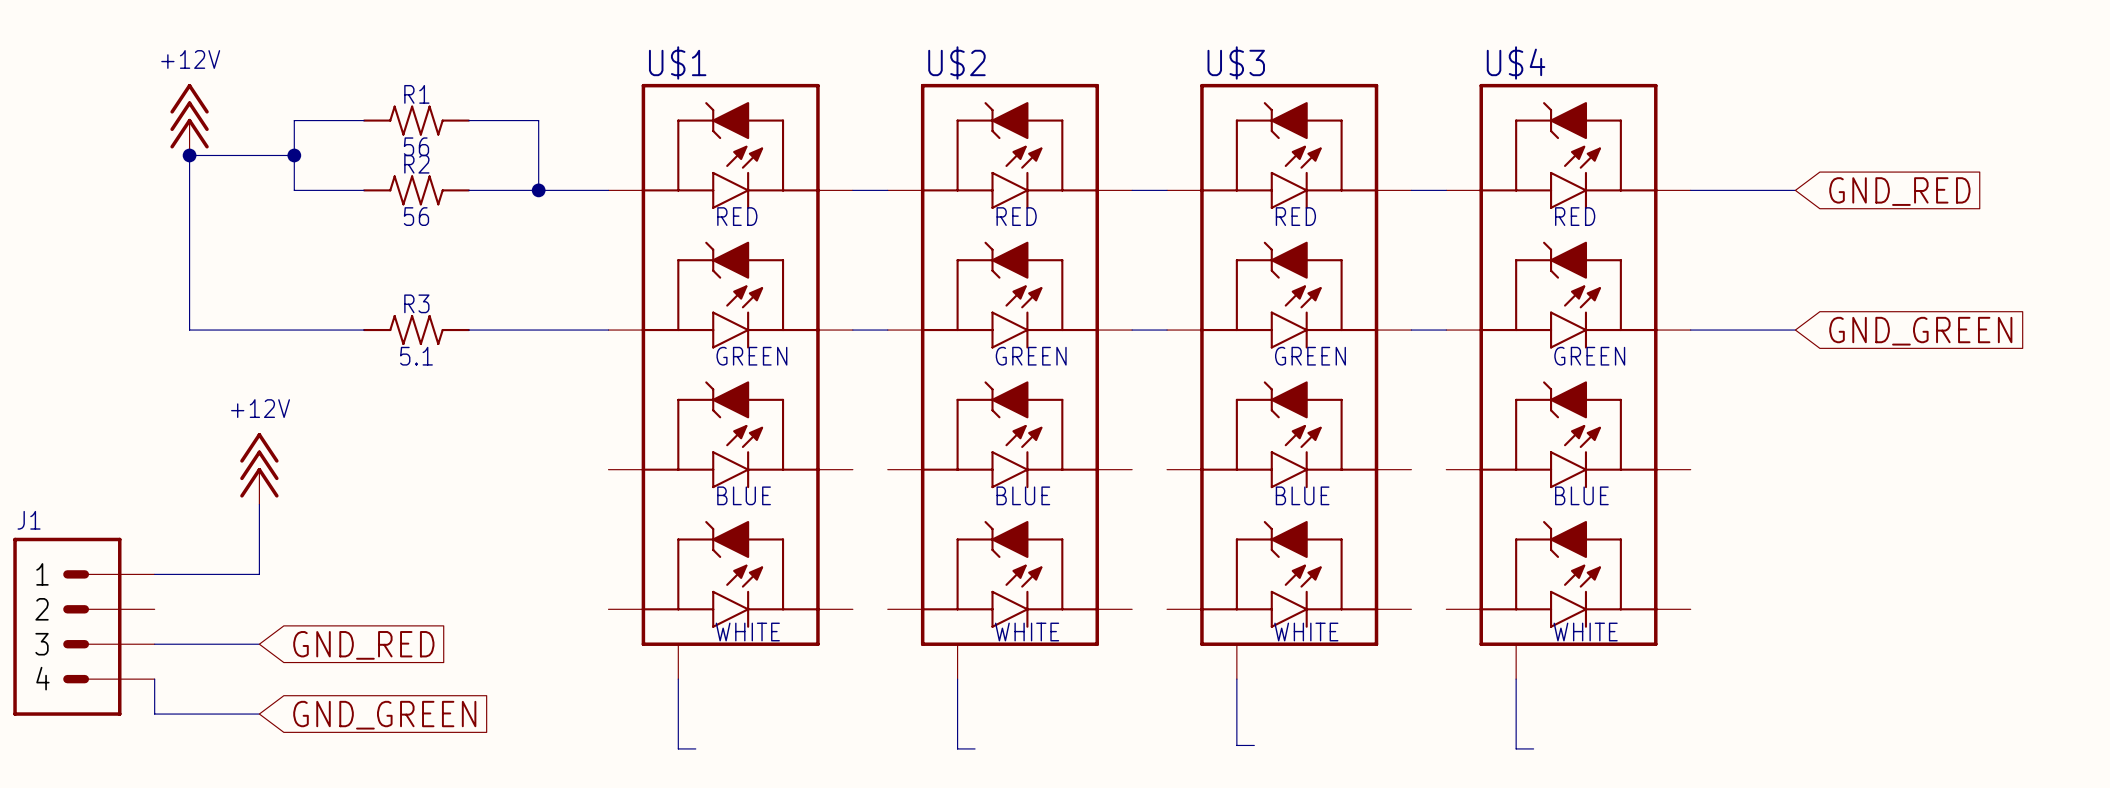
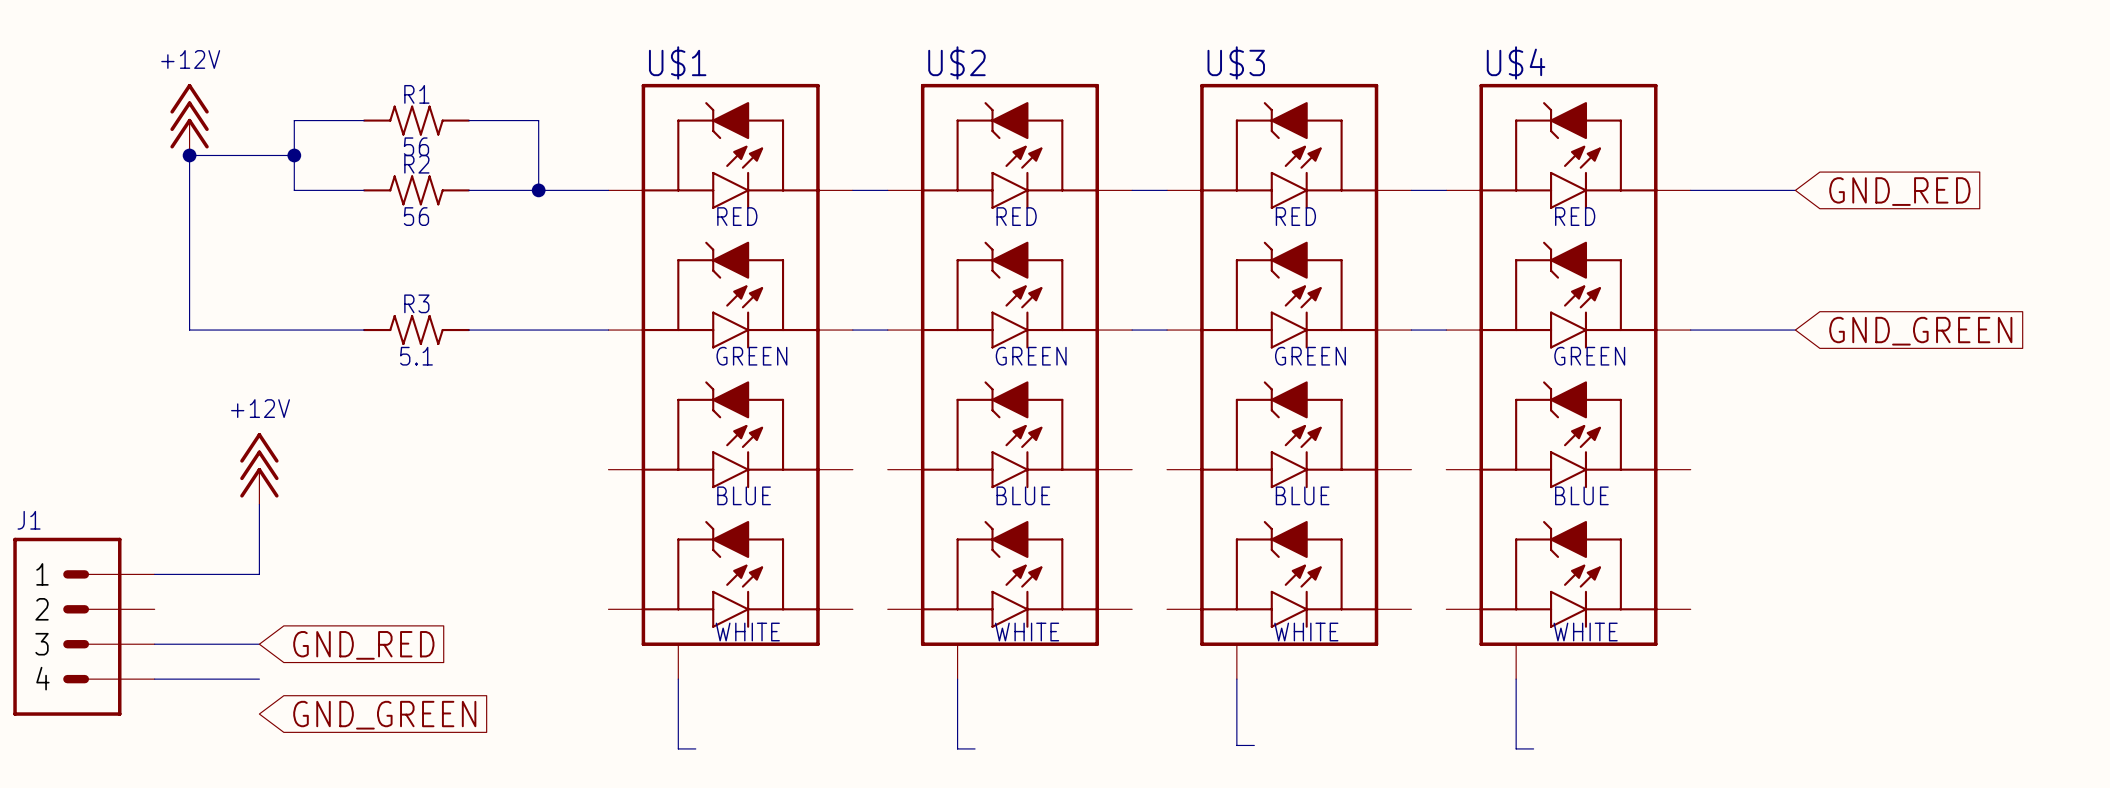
wire: (154, 679) (154, 714) (259, 714) -> (154, 679) (259, 679)

